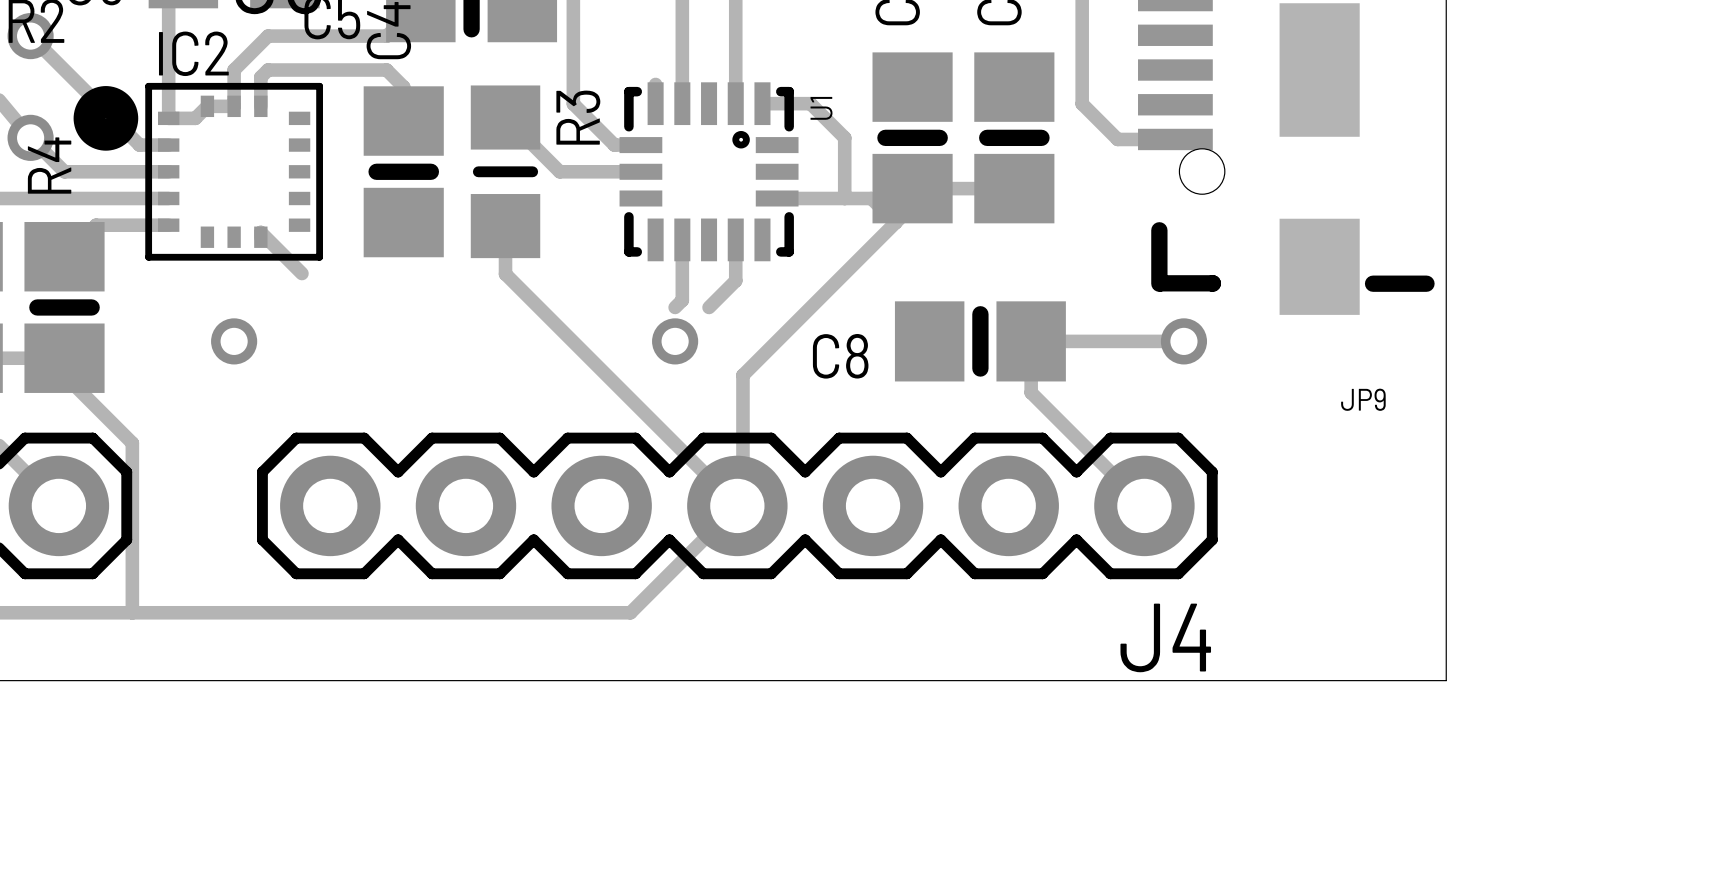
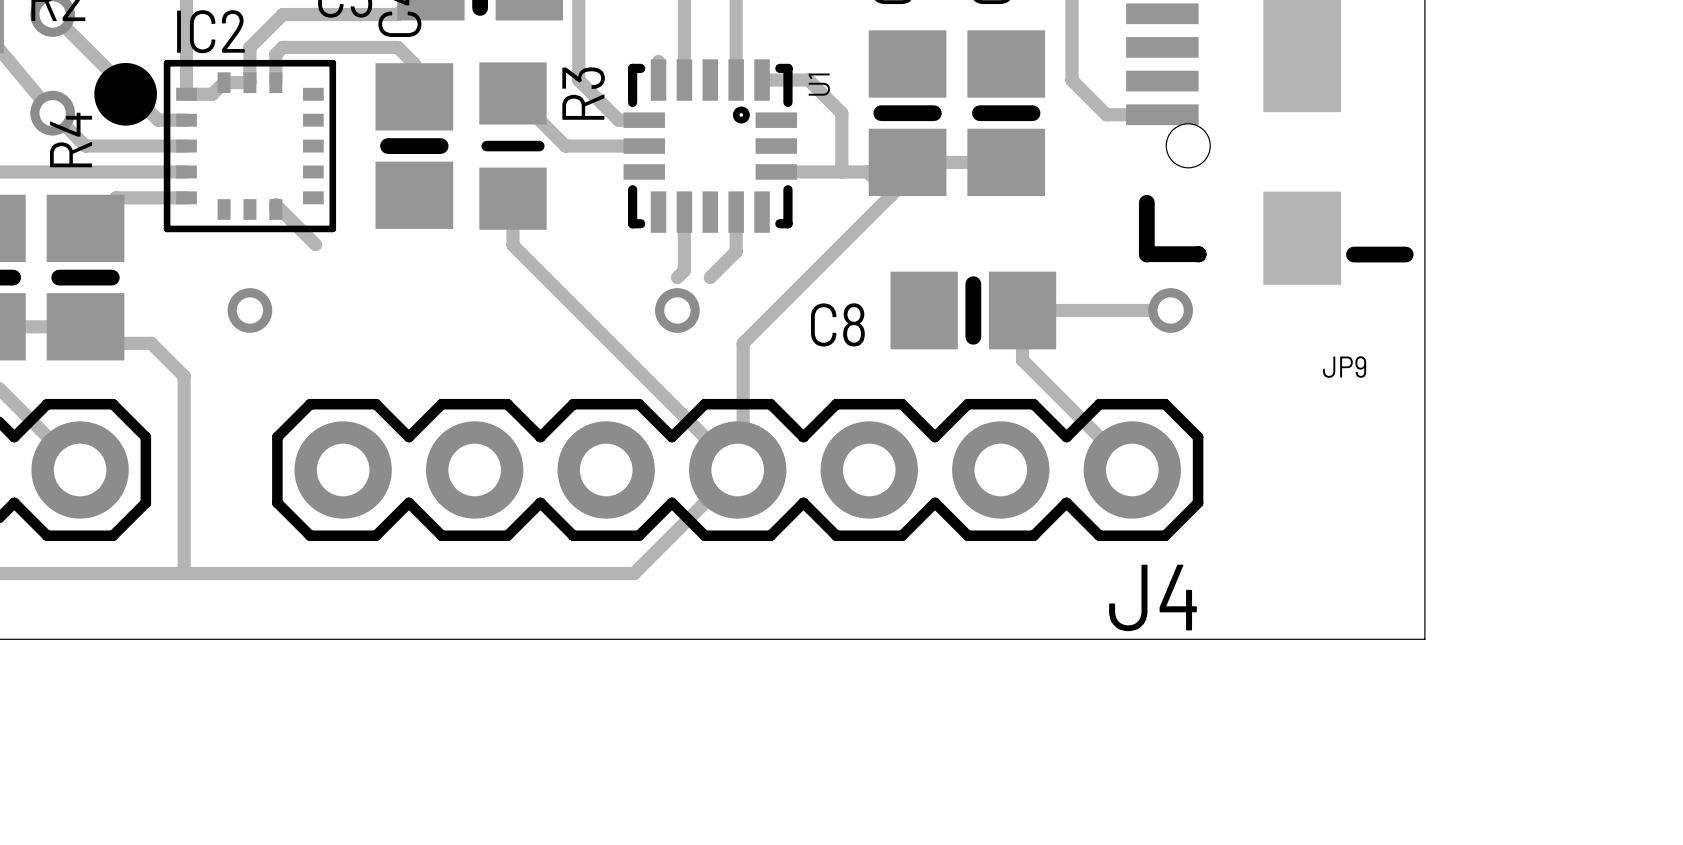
track: (64, 375) (132, 443) (132, 612) -> (85, 343) (151, 343) (184, 376) (184, 573)

